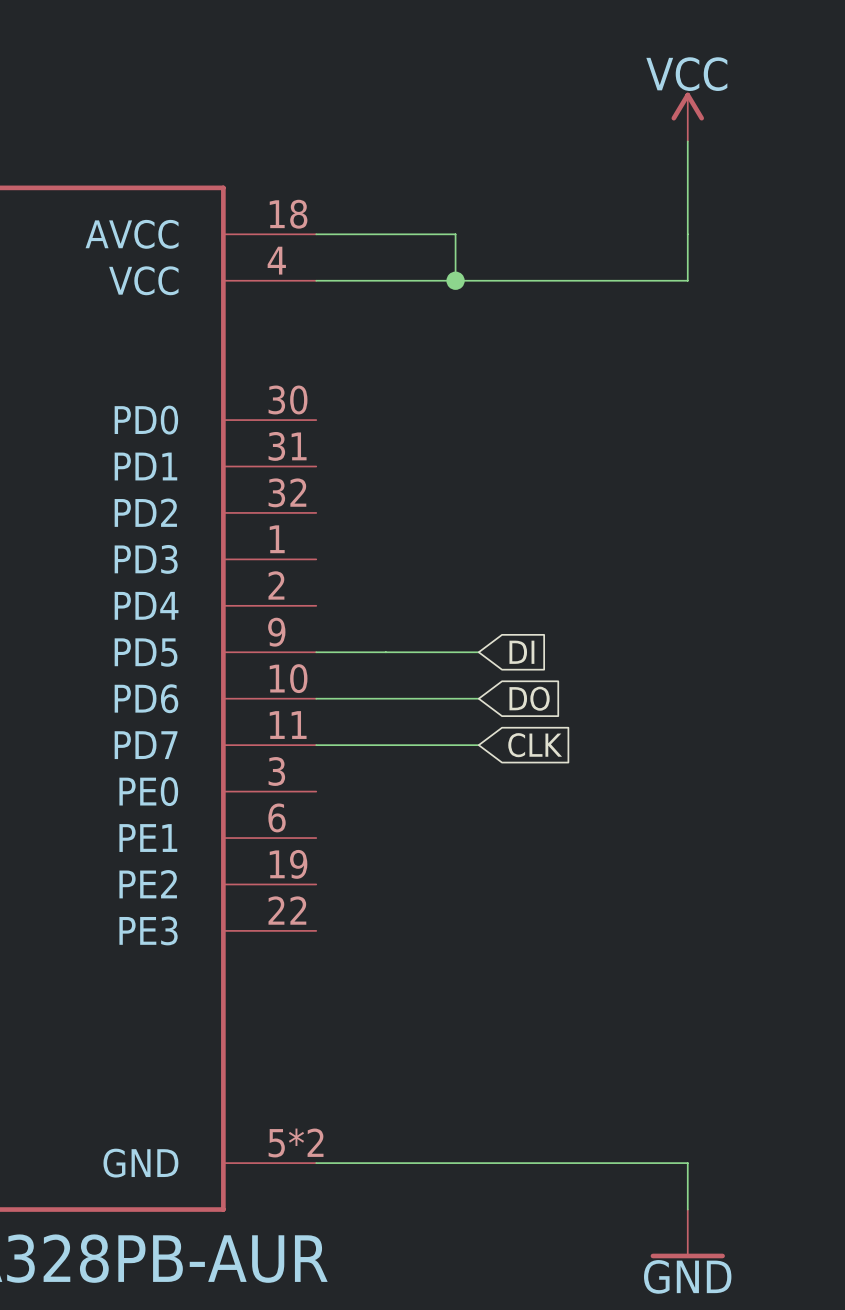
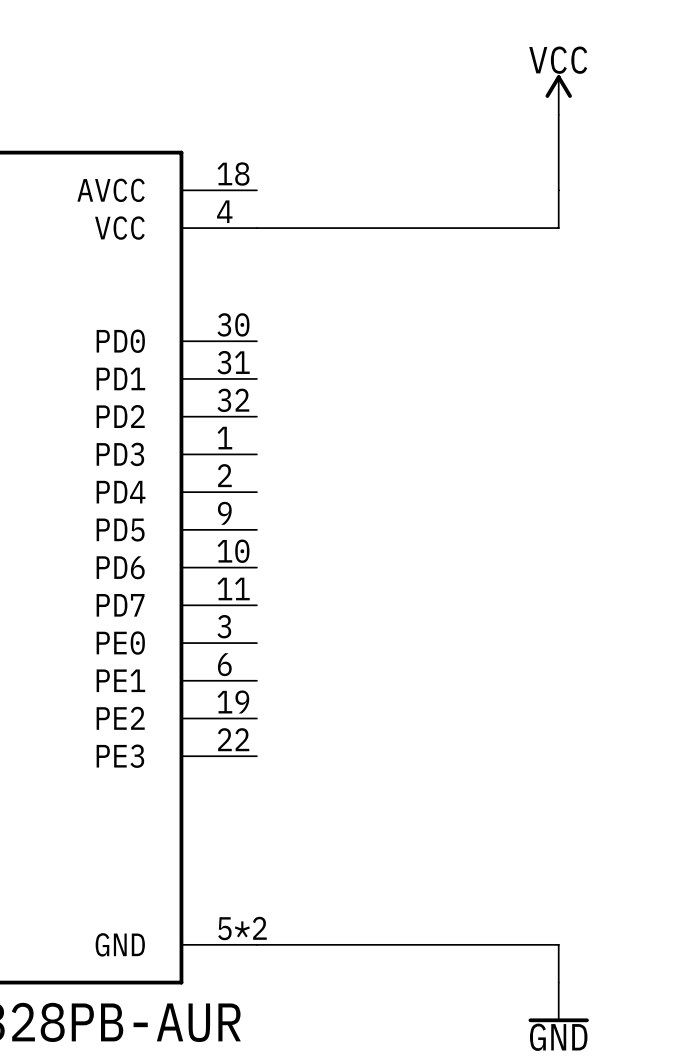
wire: (316, 234) (455, 234) (455, 280) -> none
junction: (455, 280) -> none
wire: (316, 652) (478, 652) -> none
global label: DI (521, 652) -> none
wire: (316, 698) (478, 698) -> none
global label: DO (529, 698) -> none
wire: (316, 745) (478, 745) -> none
global label: CLK (535, 745) -> none

